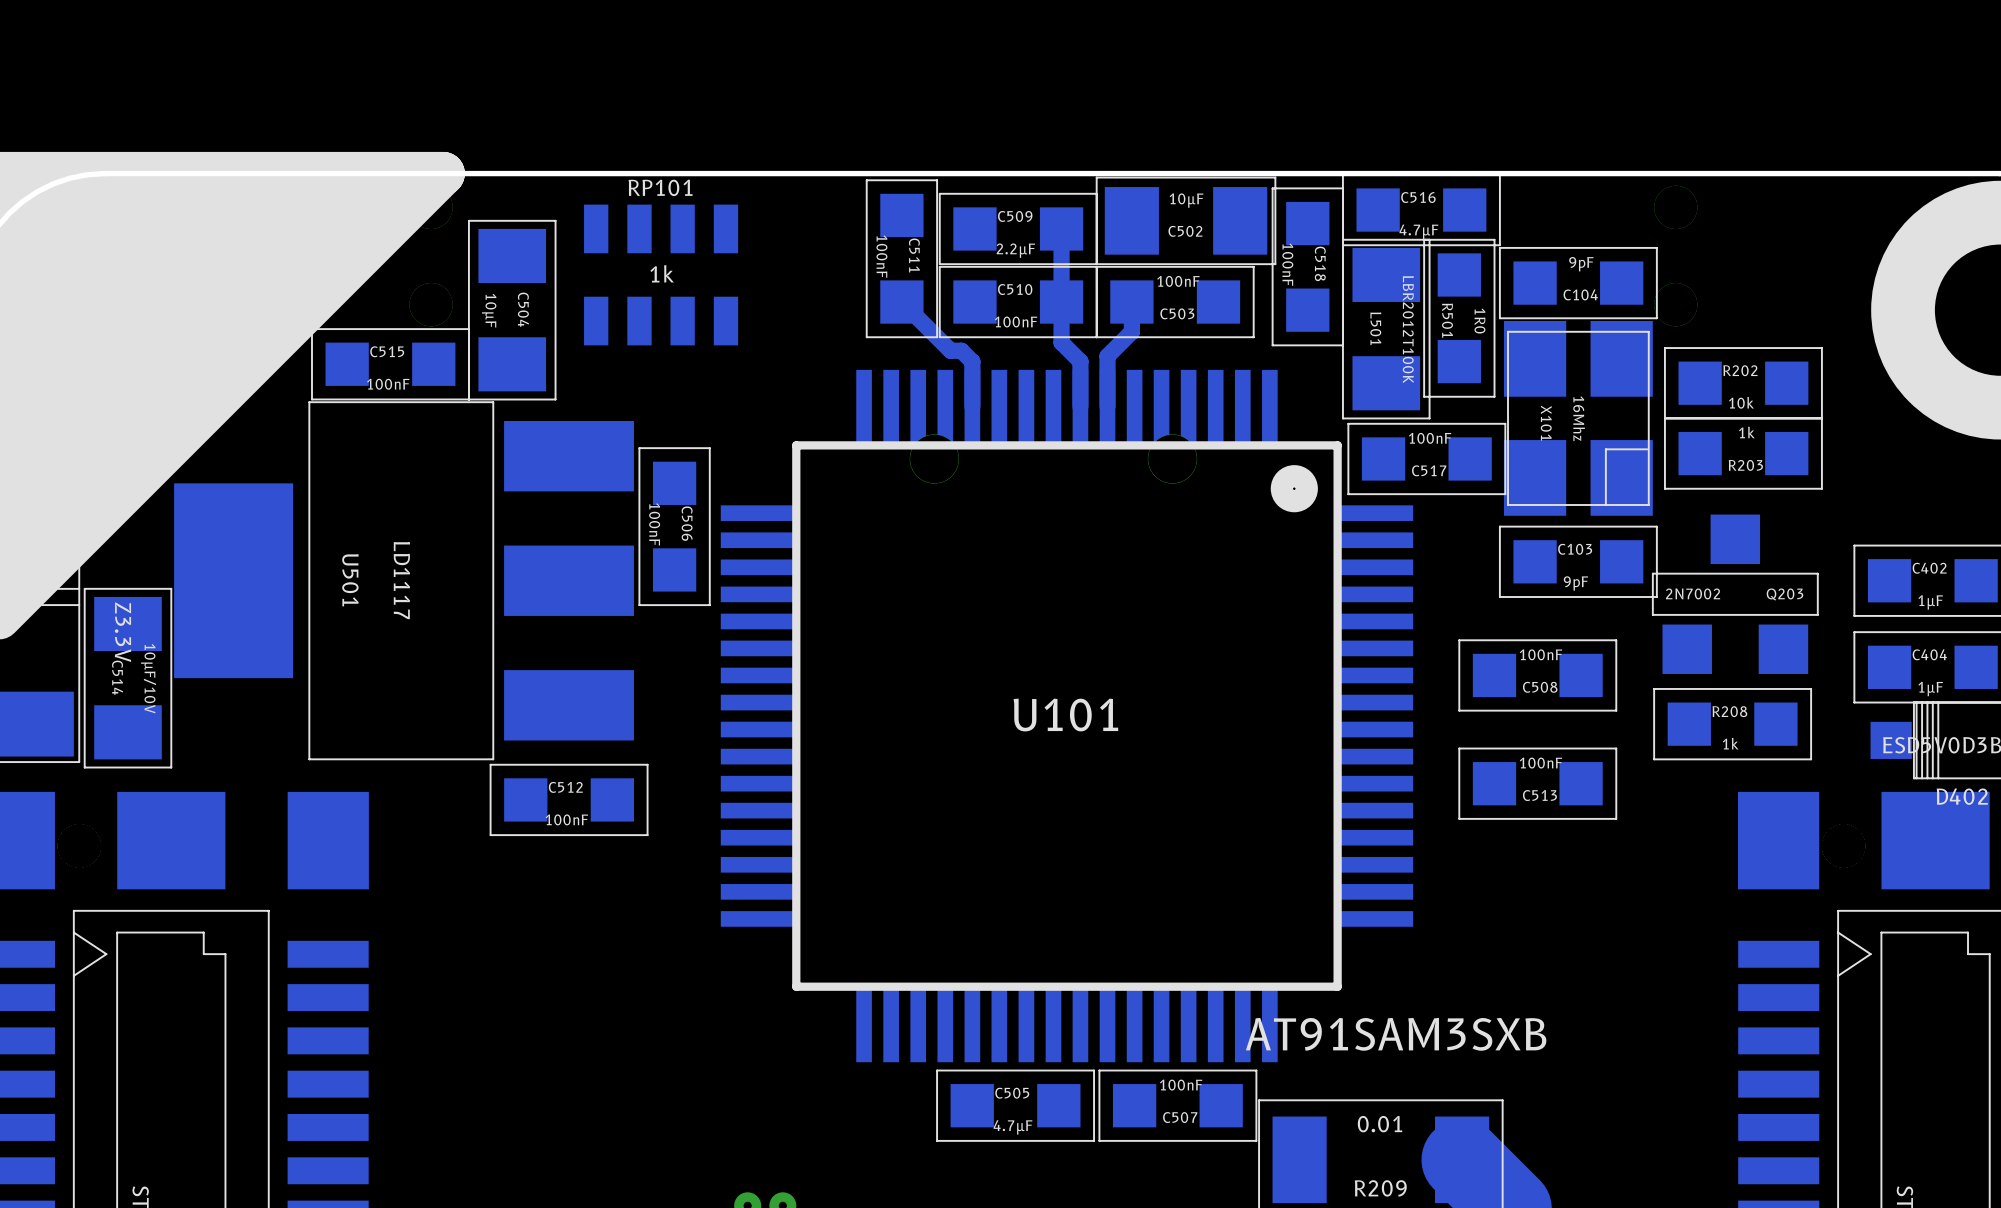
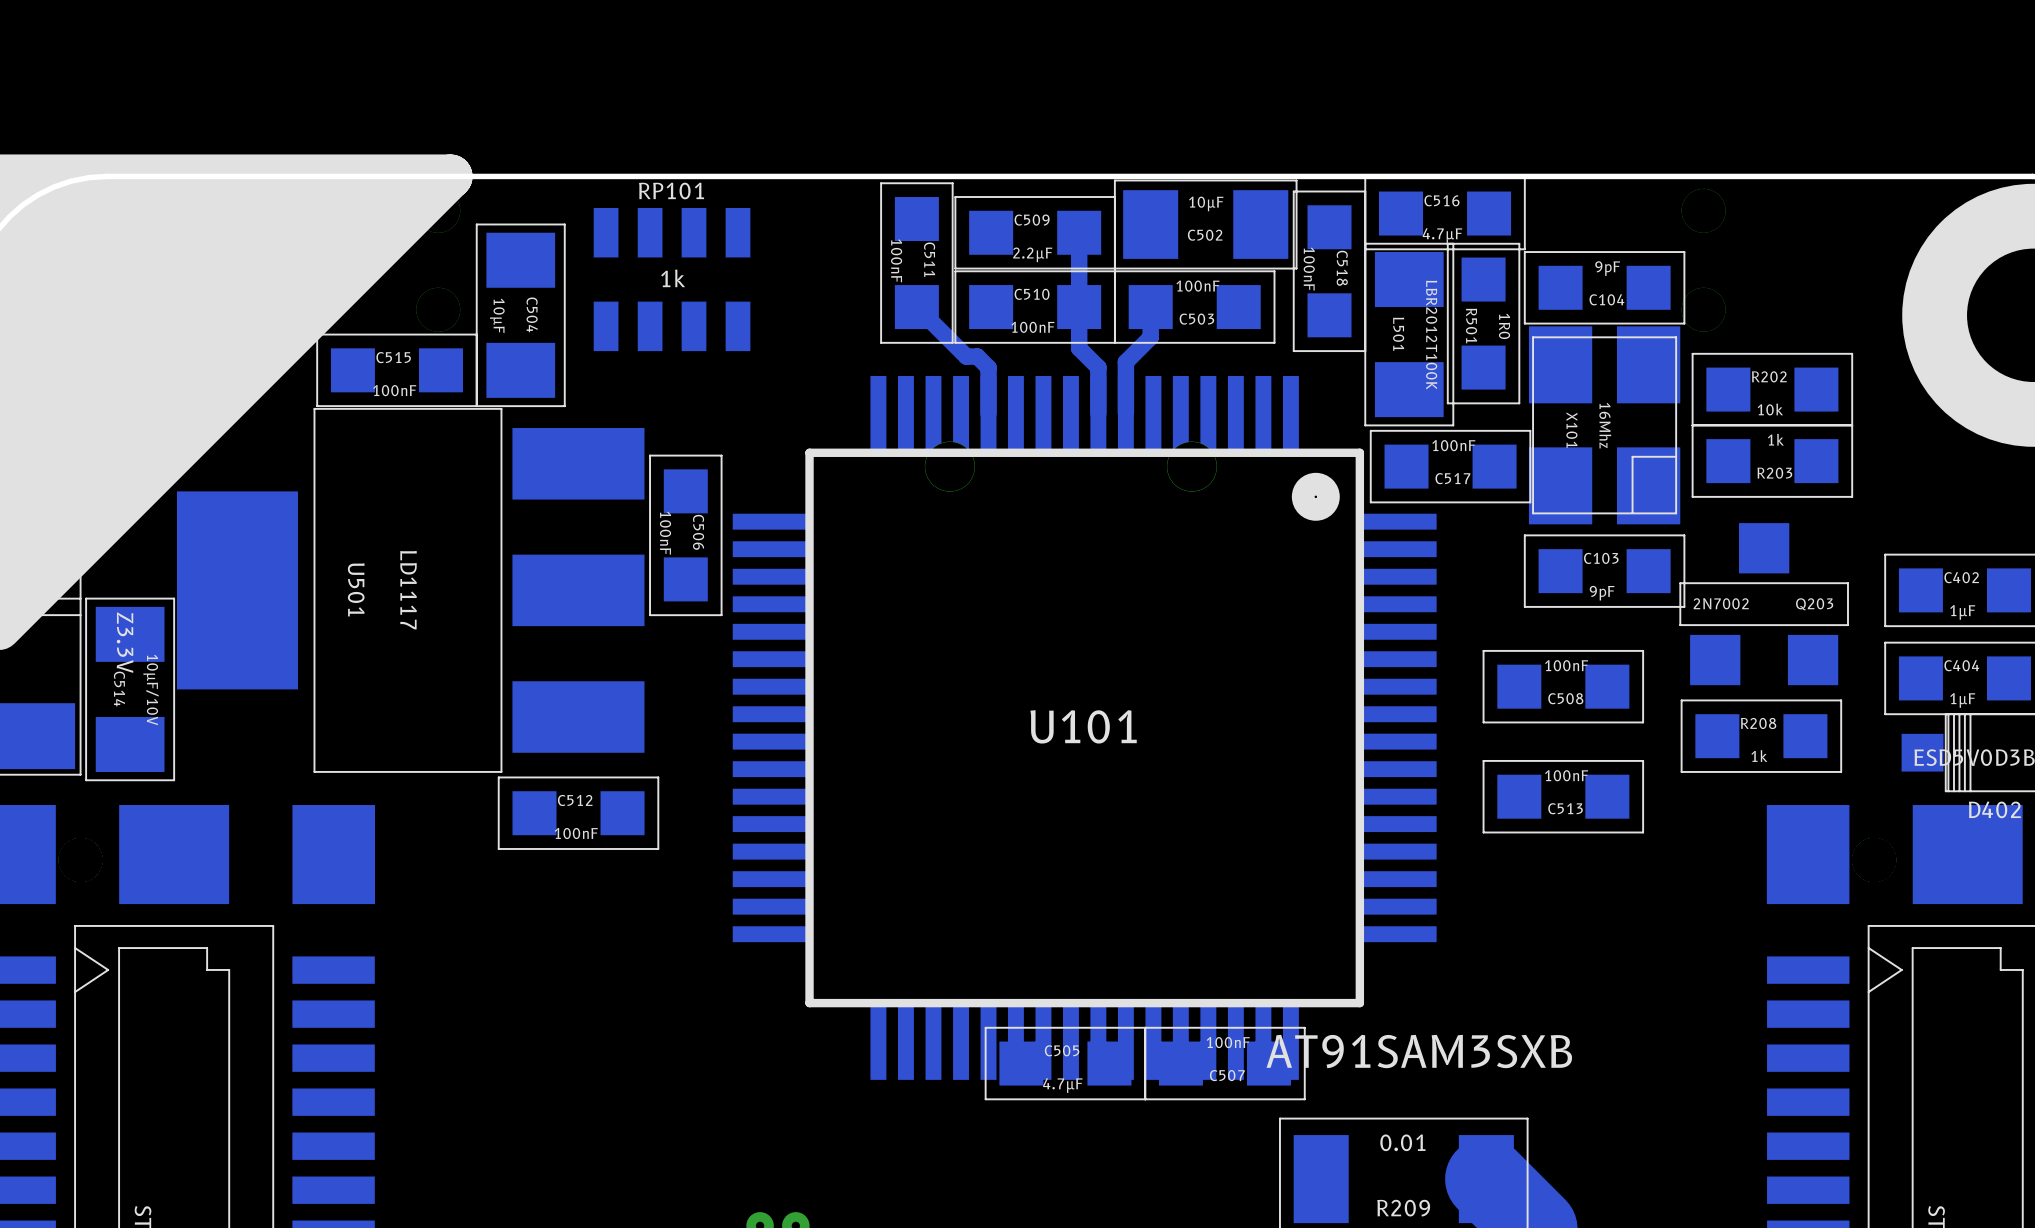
C505 position: (1015, 1105) -> (1065, 1063)
C507 position: (1177, 1105) -> (1224, 1063)

